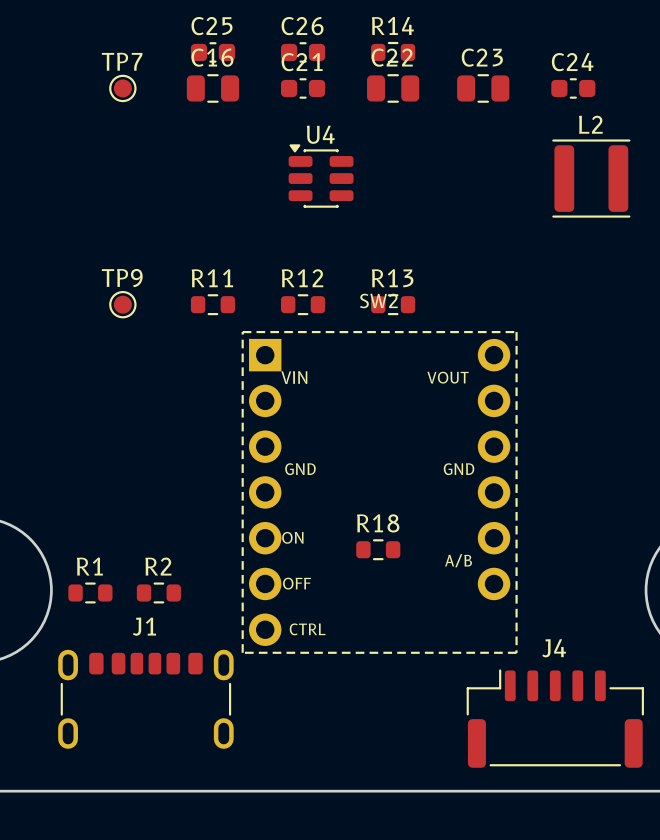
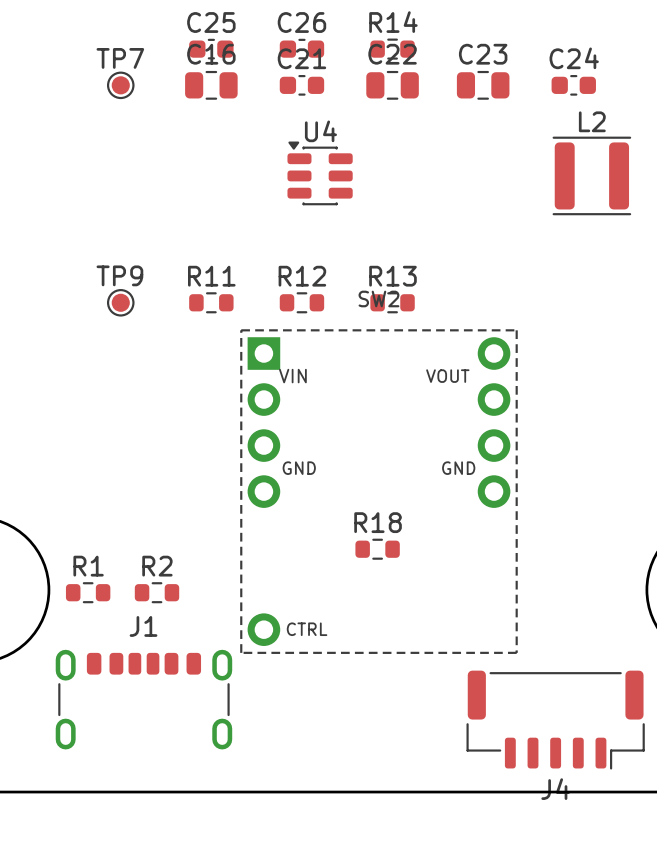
SW2 footprint: [241, 330, 518, 654] -> [240, 329, 518, 654]
J4 rotation: 0° (555, 718) -> 180° (555, 720)

